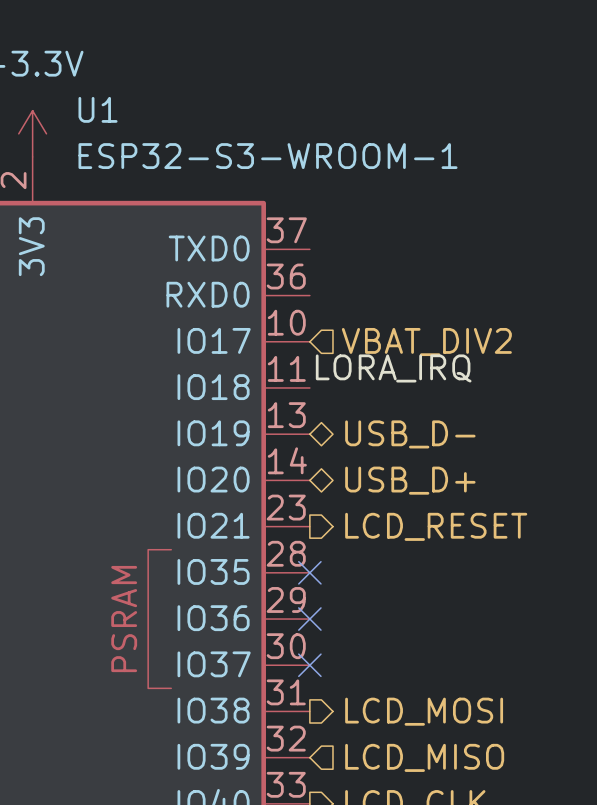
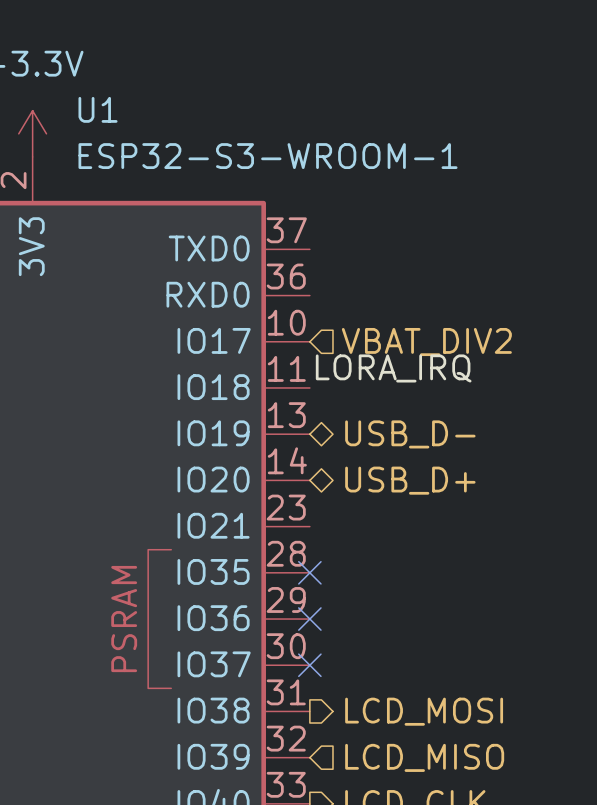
hierarchical label: LCD_RESET (436, 526) -> none

